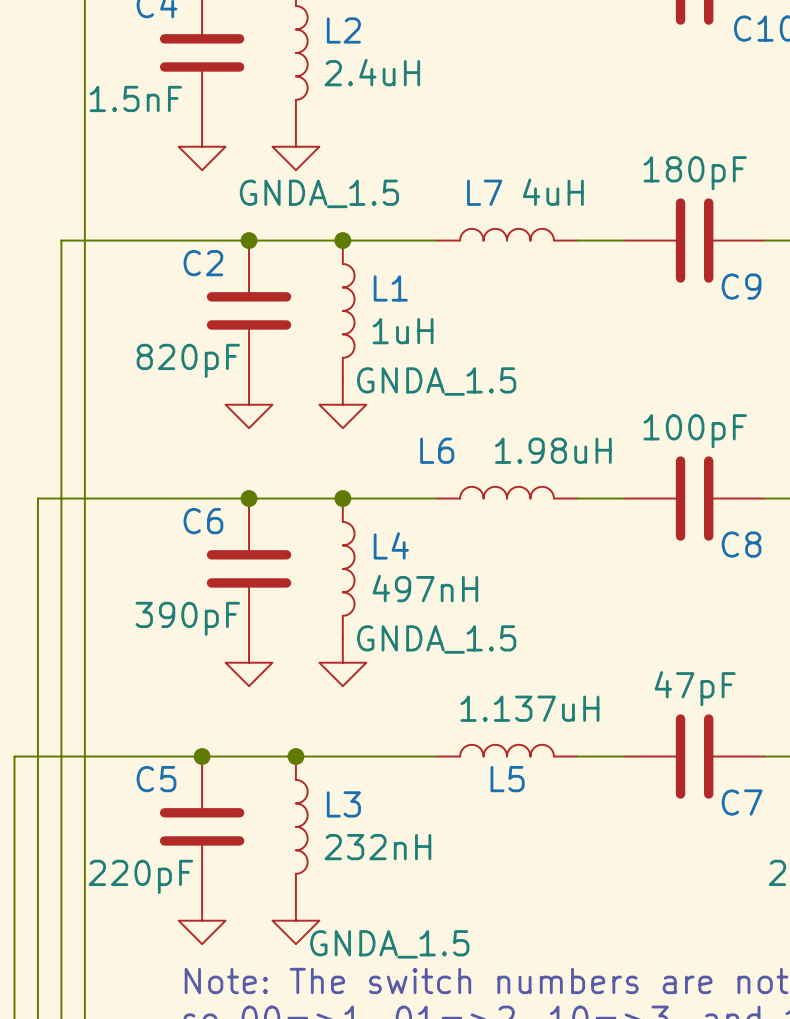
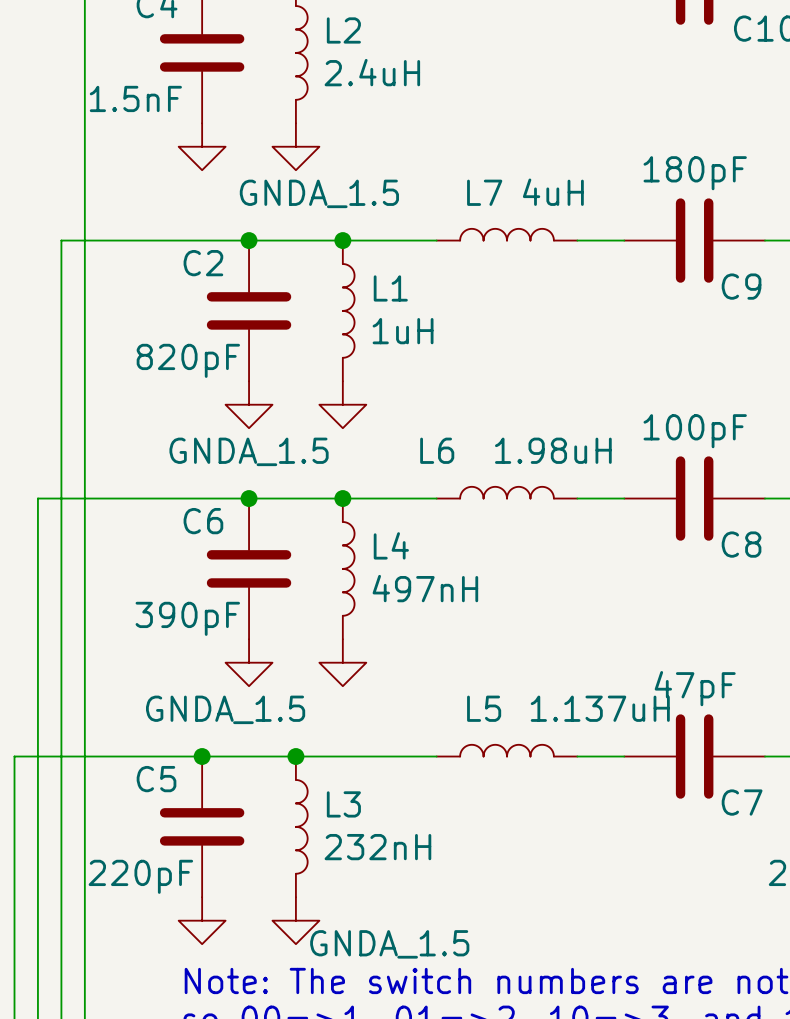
power symbol text position: GNDA_1.5 (436, 381) -> GNDA_1.5 (249, 451)
power symbol text position: GNDA_1.5 (436, 639) -> GNDA_1.5 (225, 709)
L5 value position: 1.137uH (529, 708) -> 1.137uH (600, 708)
L5 name position: L5 (507, 779) -> L5 (484, 708)

